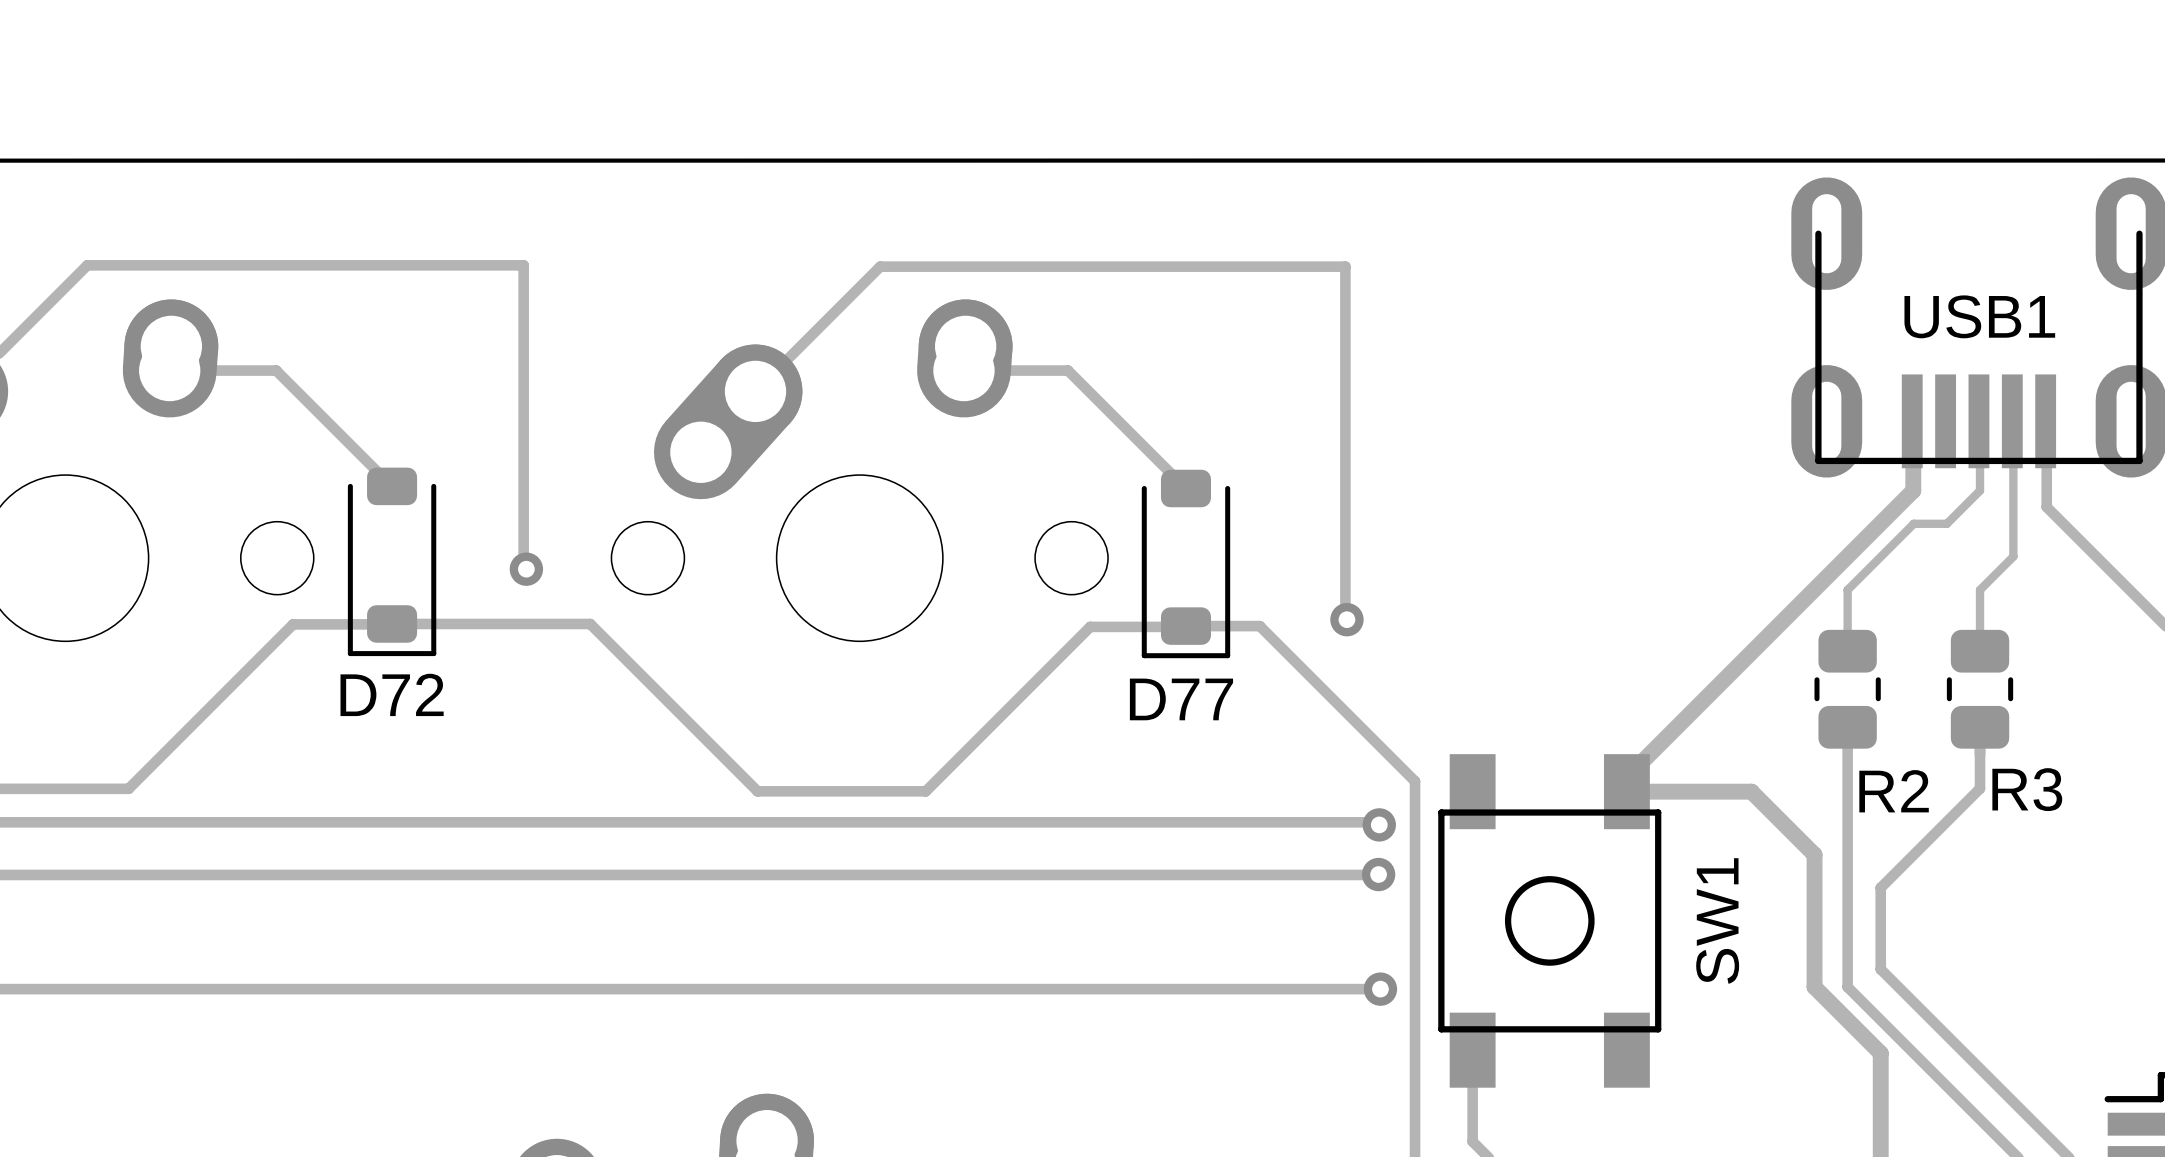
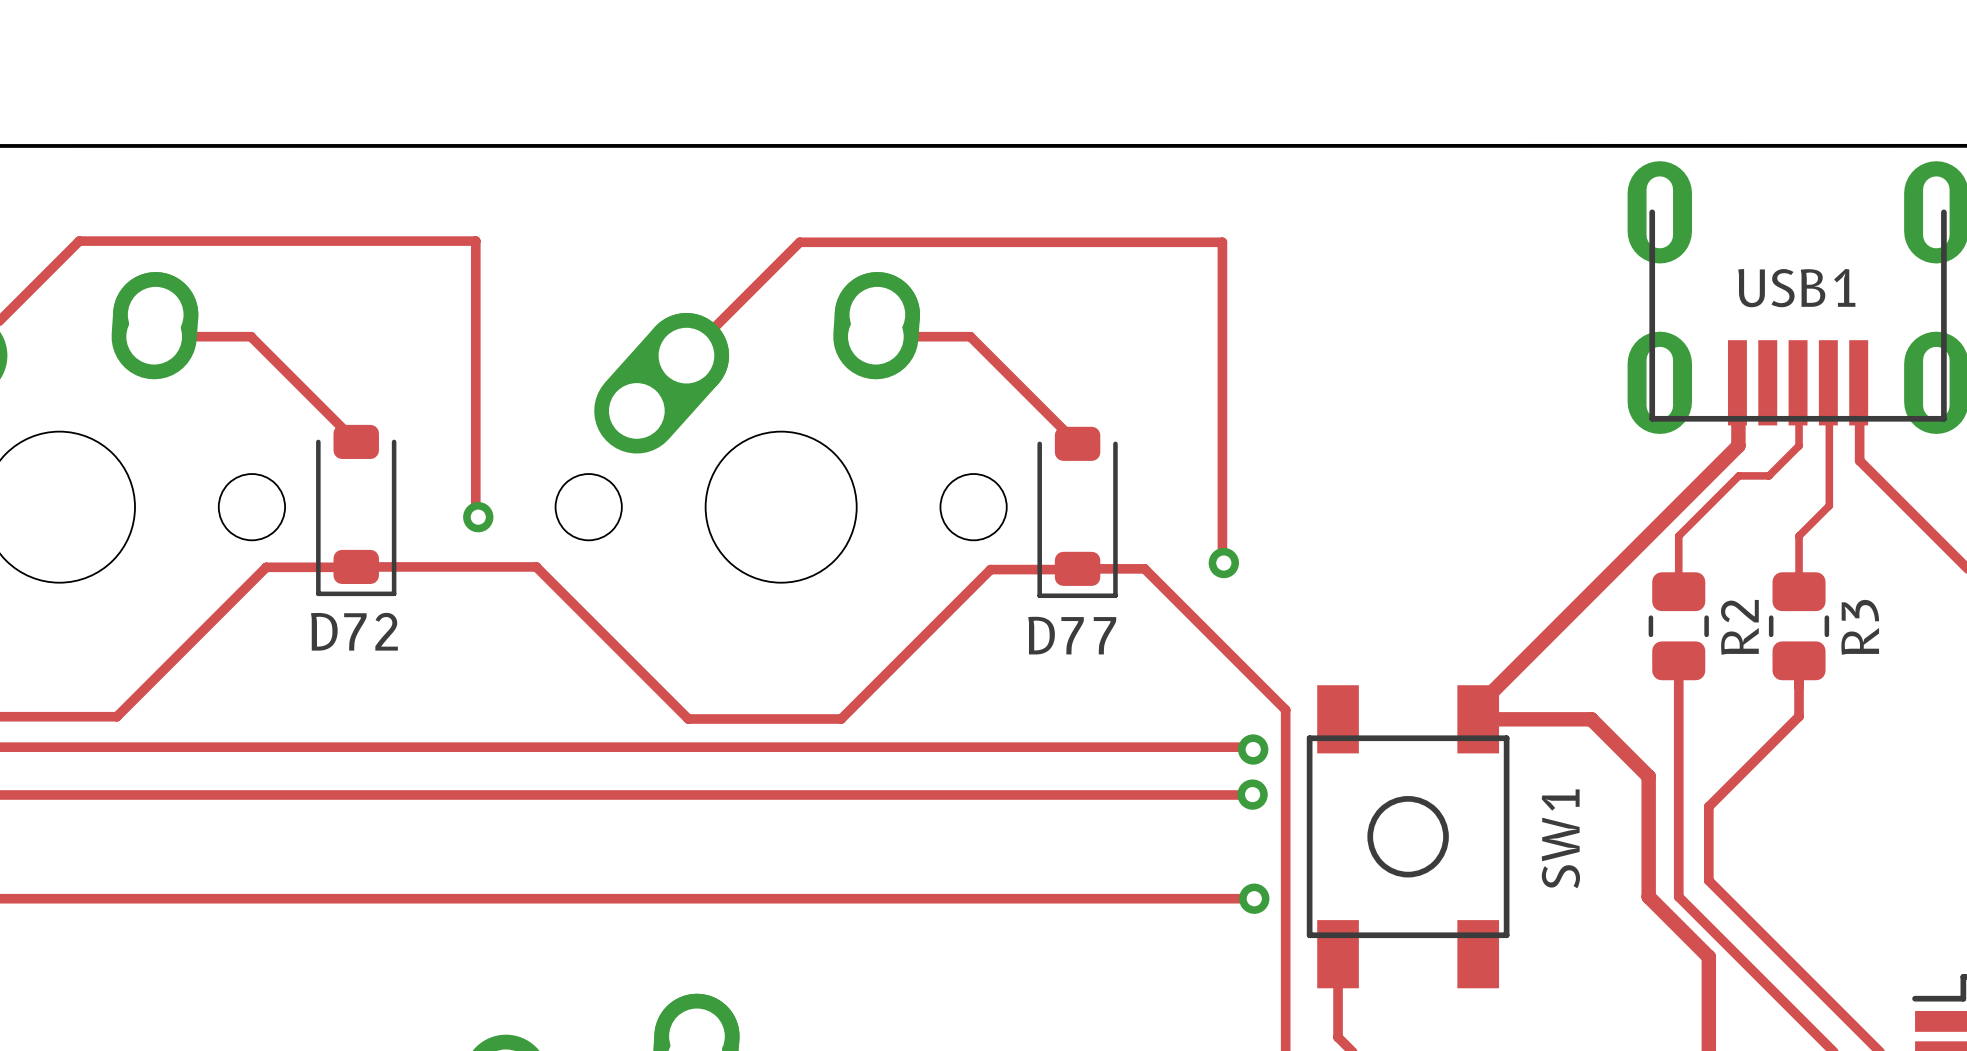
R3 name rotation: 0° (2027, 789) -> 90° counterclockwise (1860, 627)
R3 name position: R3 (2027, 789) -> R3 (1860, 627)
R2 name rotation: 0° (1894, 791) -> 90° counterclockwise (1739, 627)
R2 name position: R2 (1894, 791) -> R2 (1739, 627)

